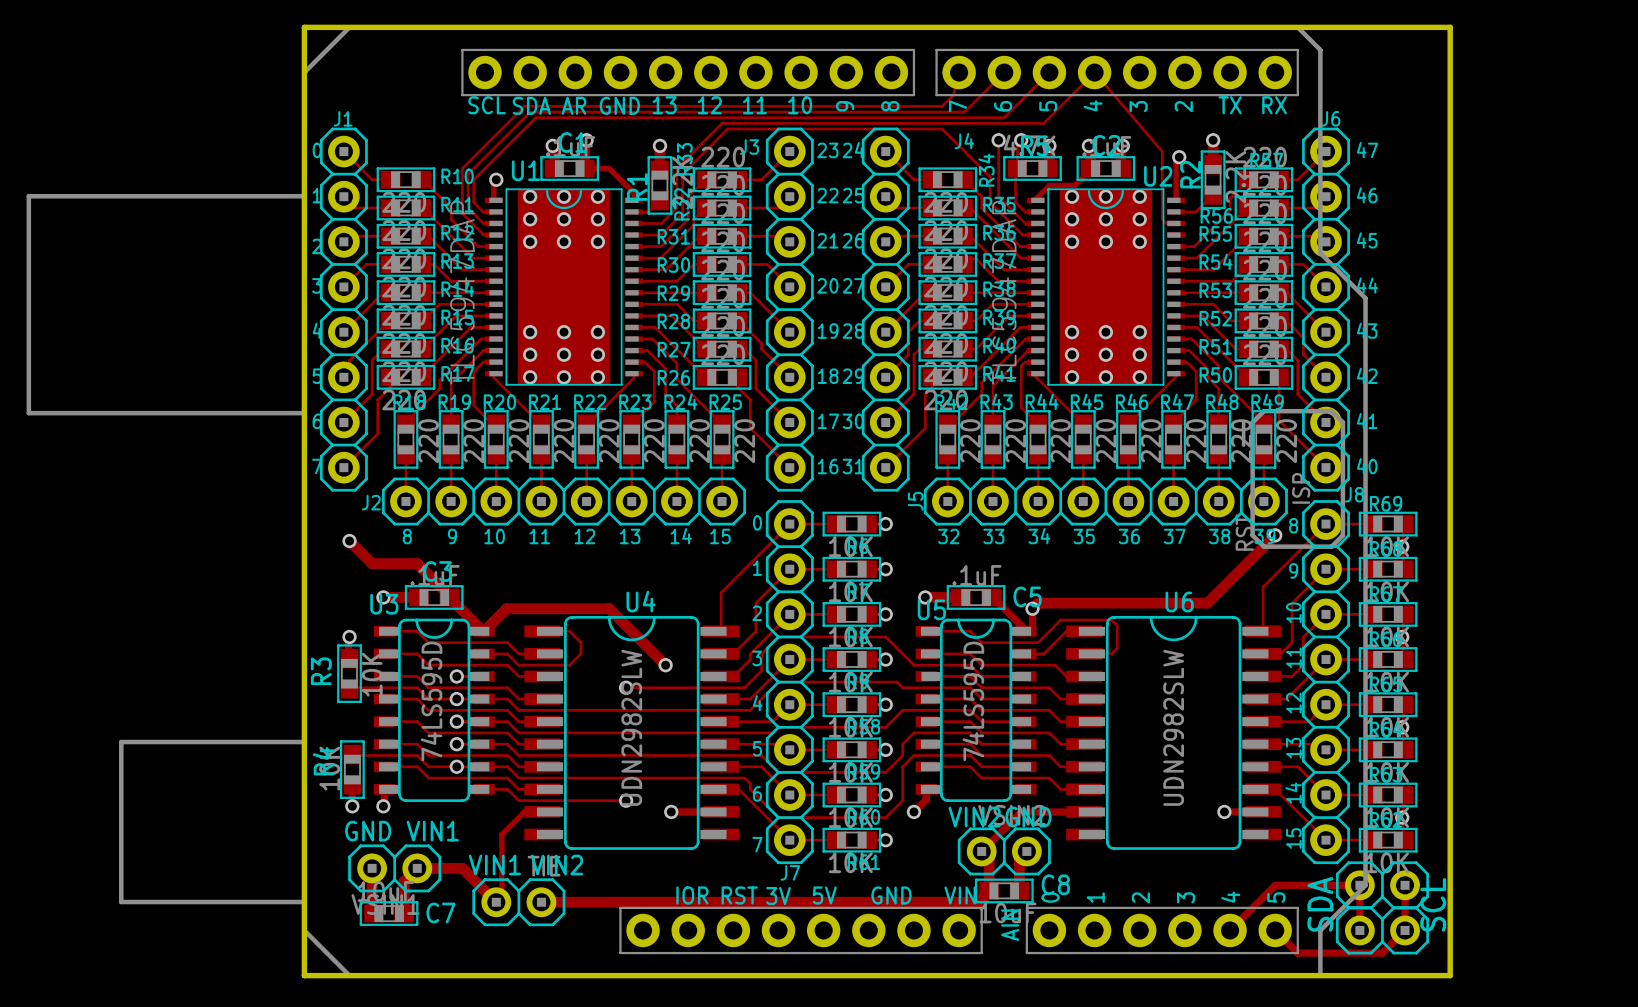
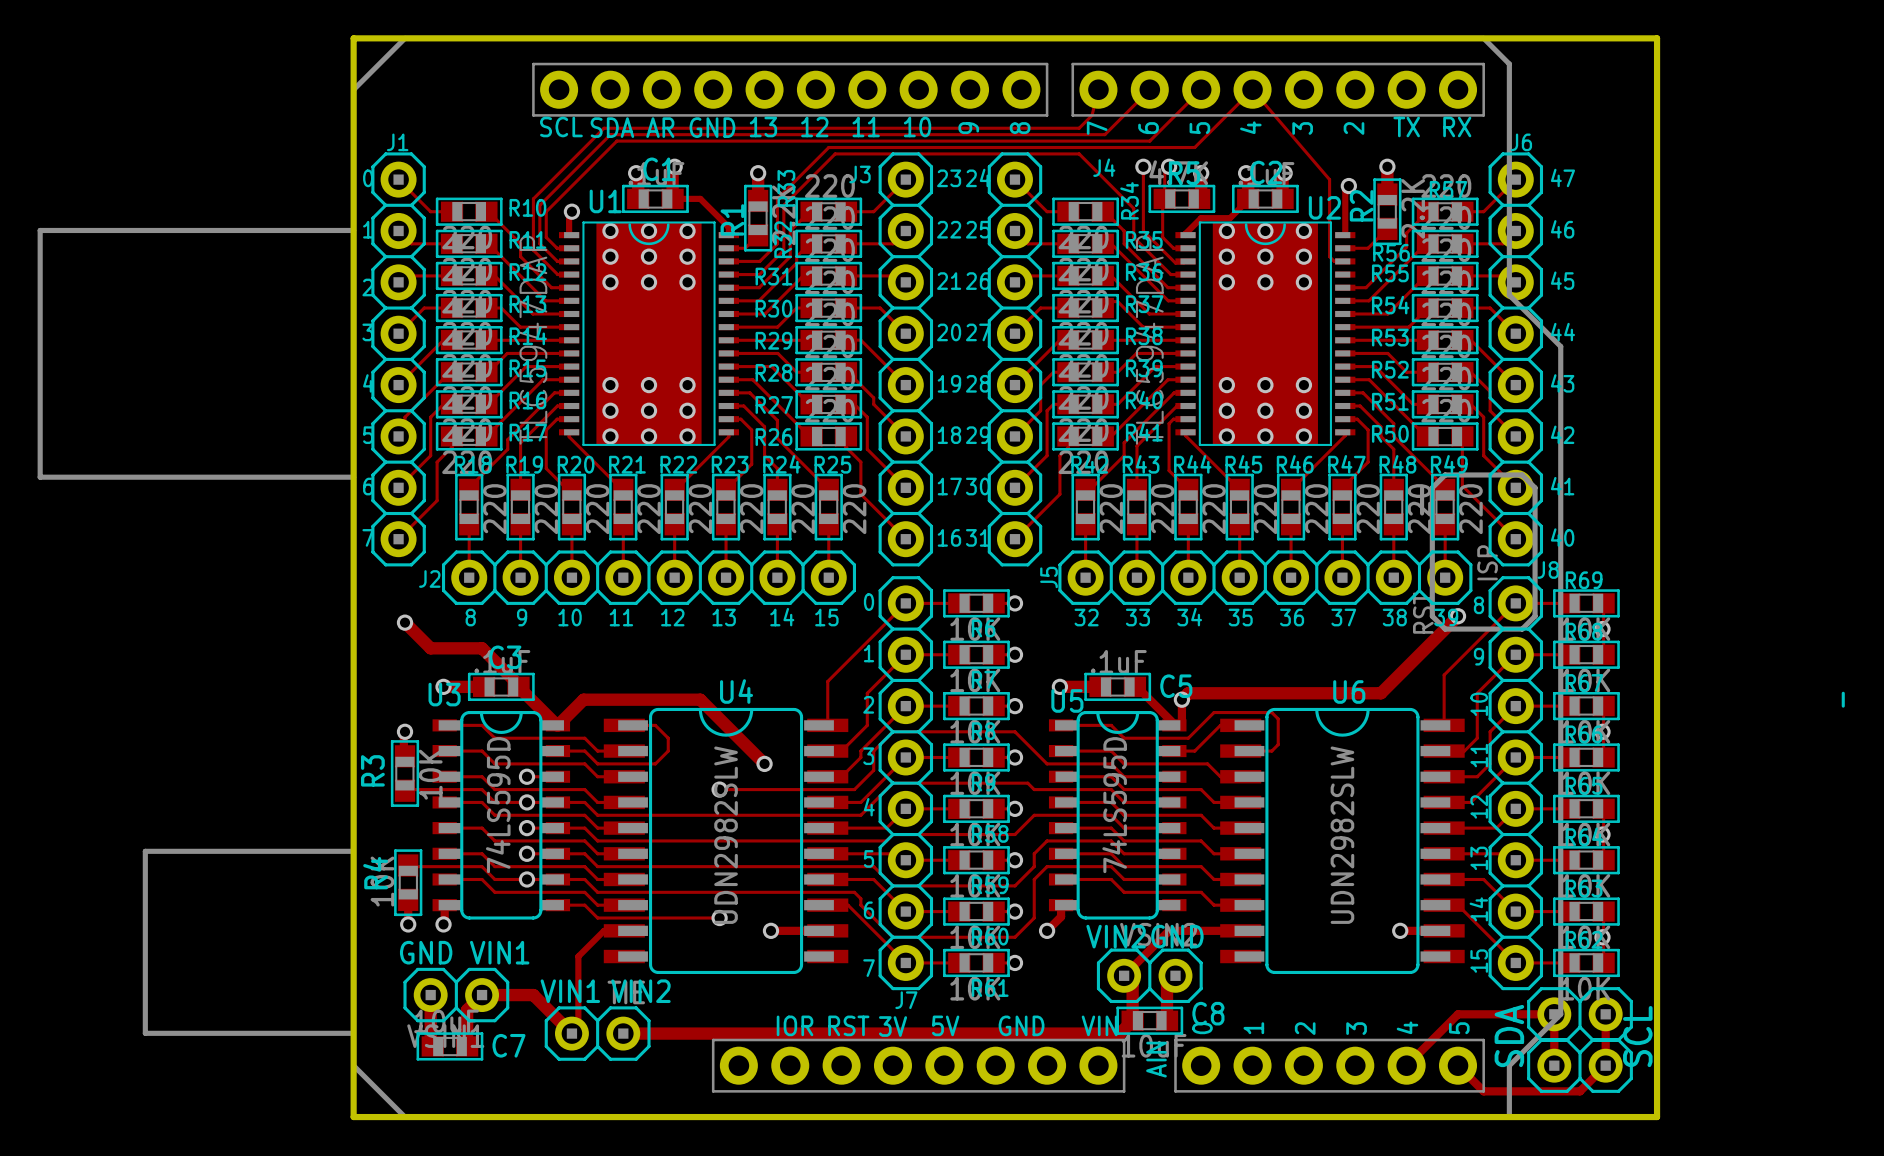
line: none -> (1843, 693) (1843, 706)

